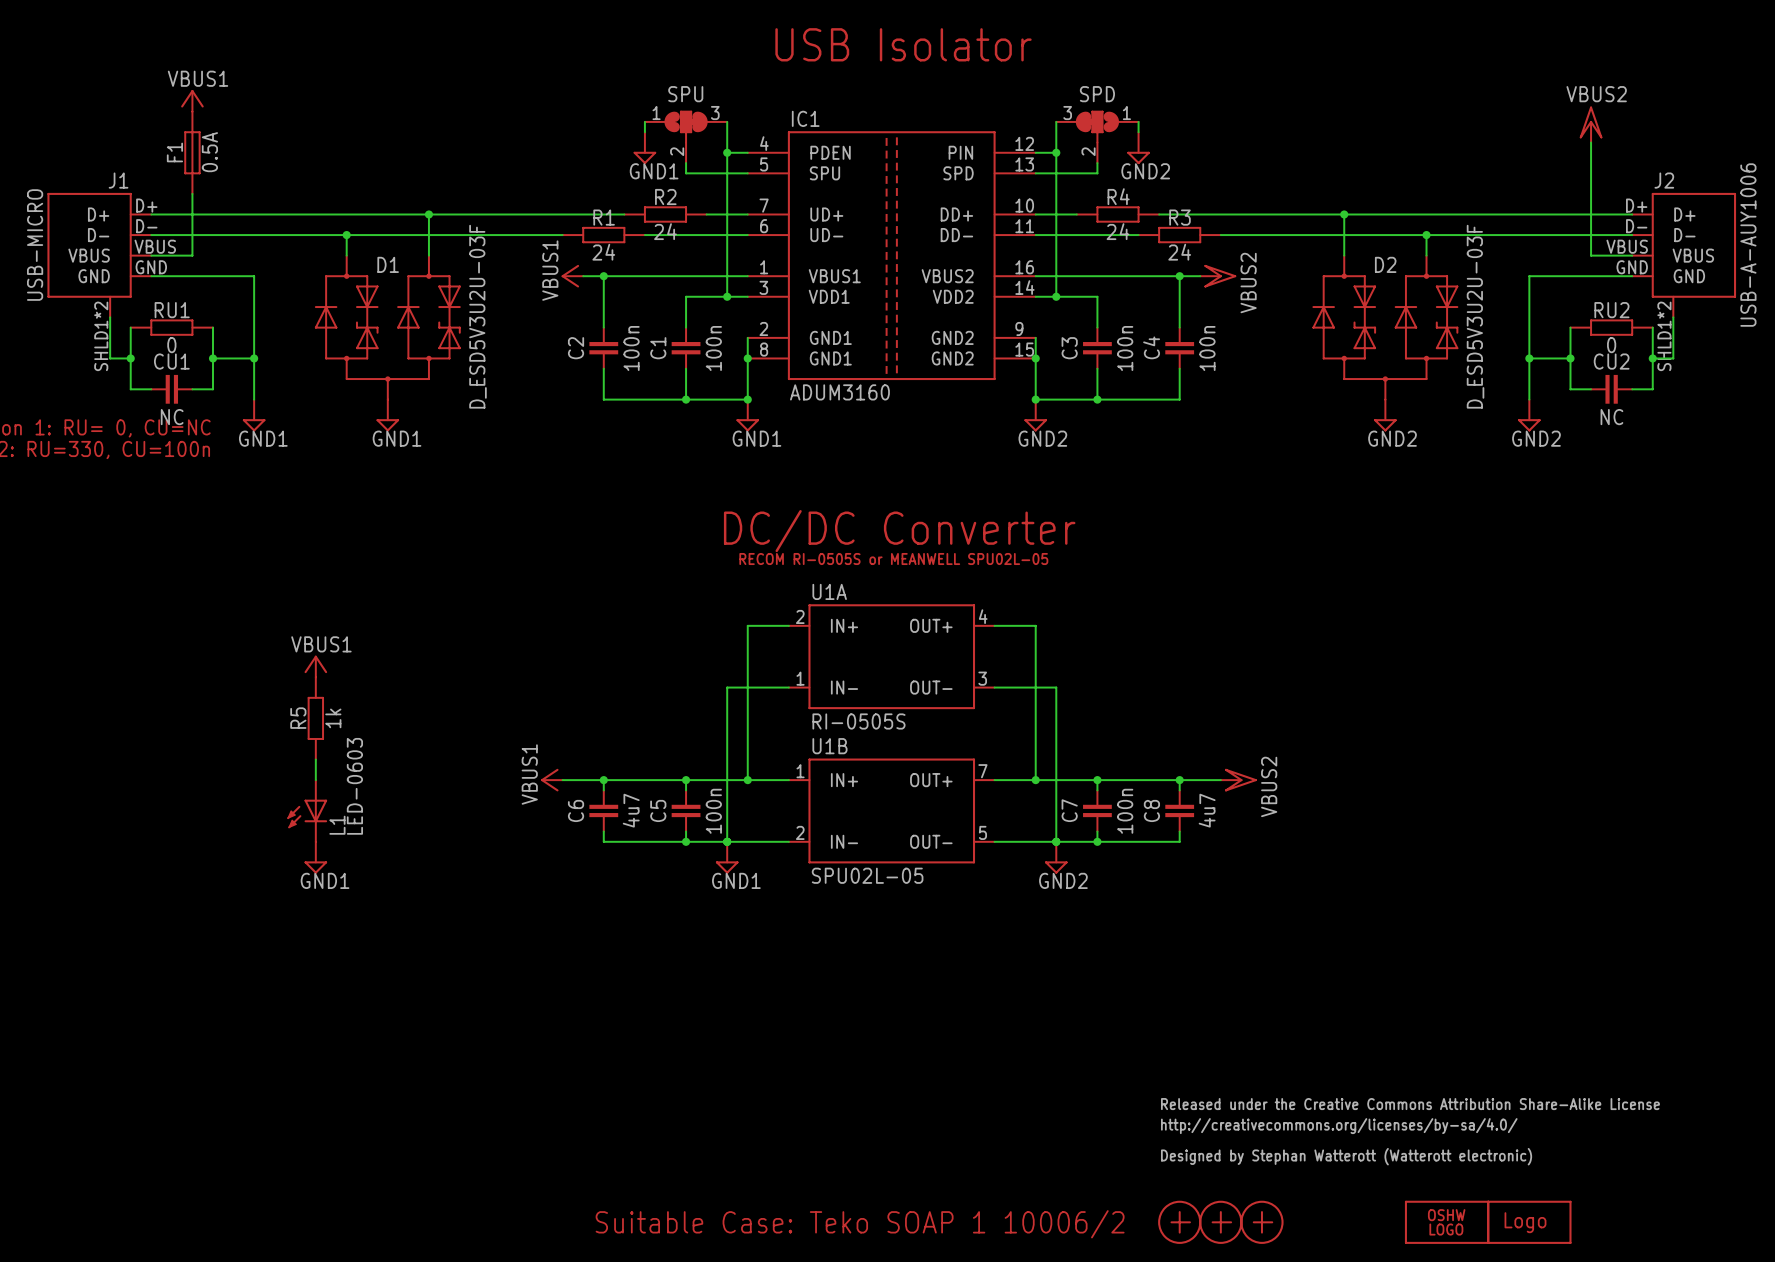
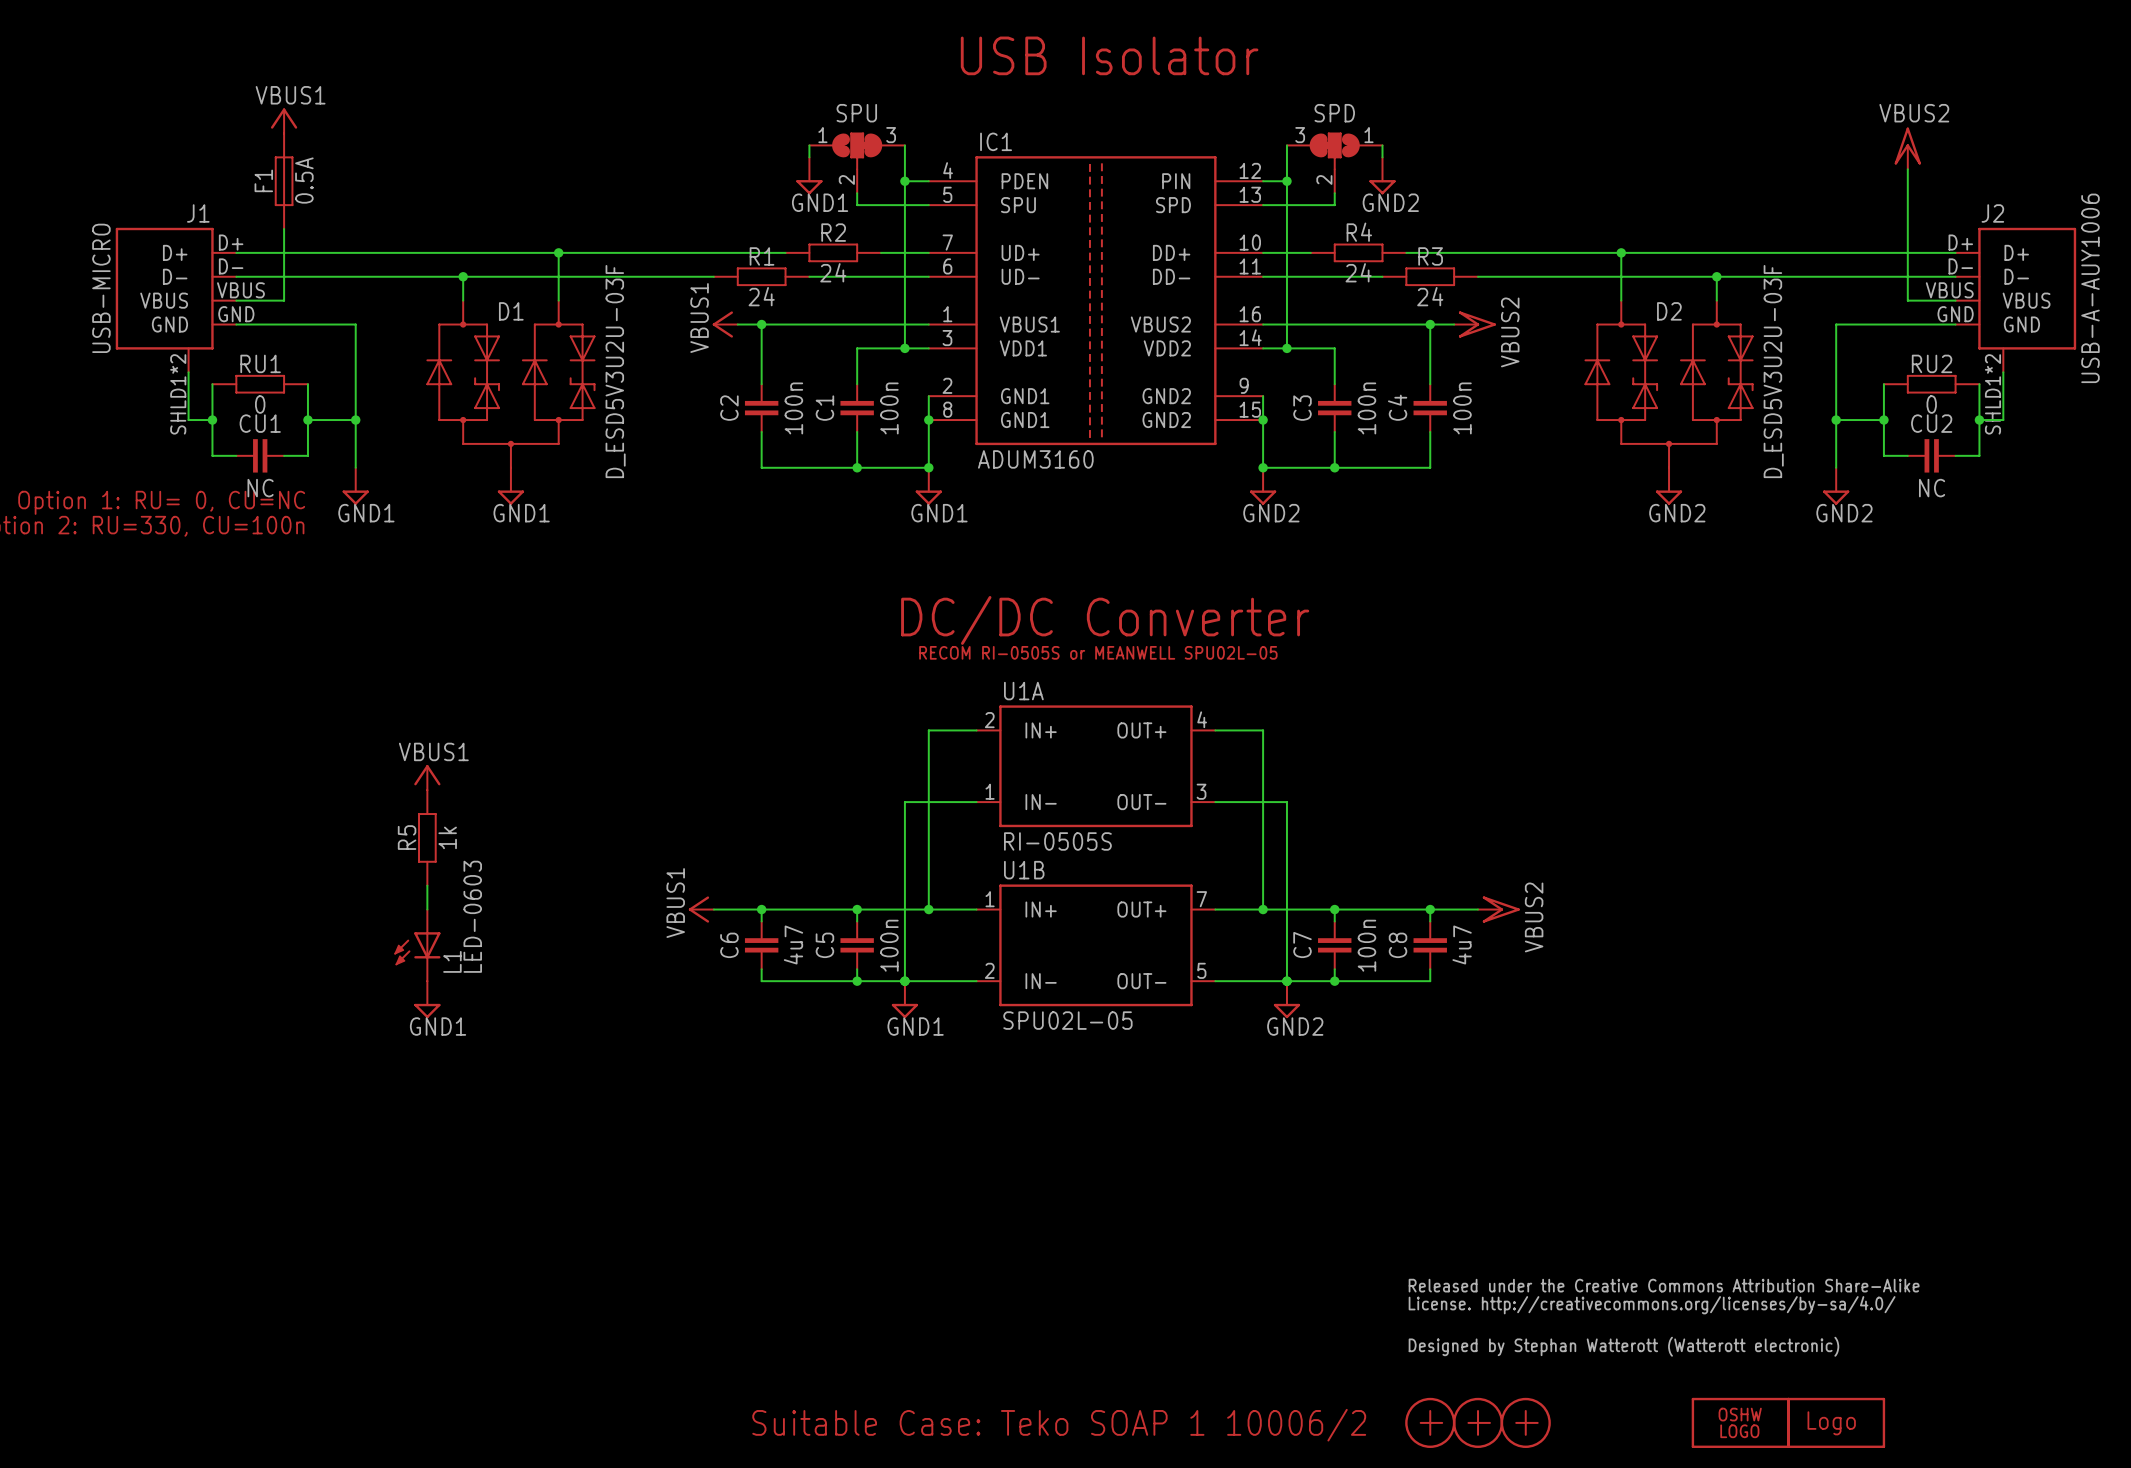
text: Released under the Creative Commons Attribution Share-Alike License (1410, 1104) -> License. http://creativecommons.org/licenses/by-sa/4.0/ (1652, 1305)
text: http://creativecommons.org/licenses/by-sa/4.0/ (1339, 1126) -> none

